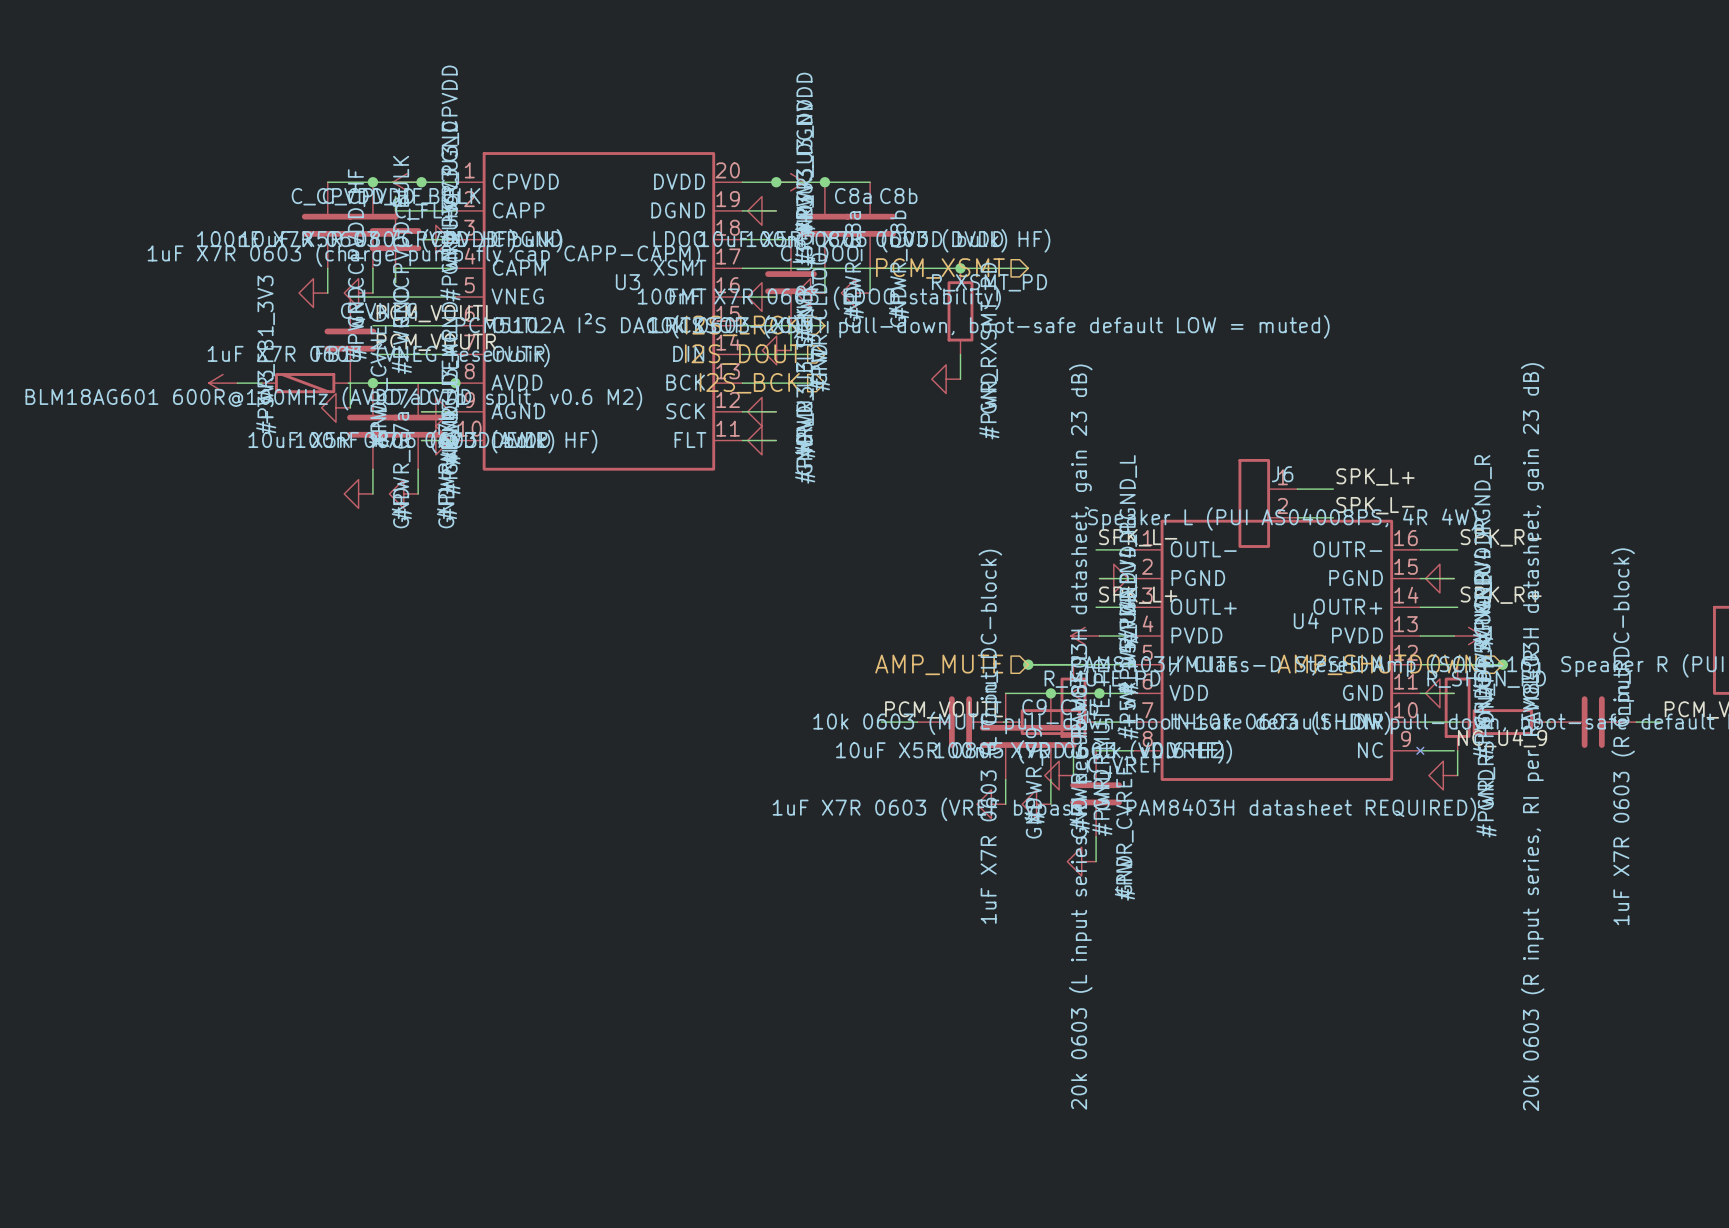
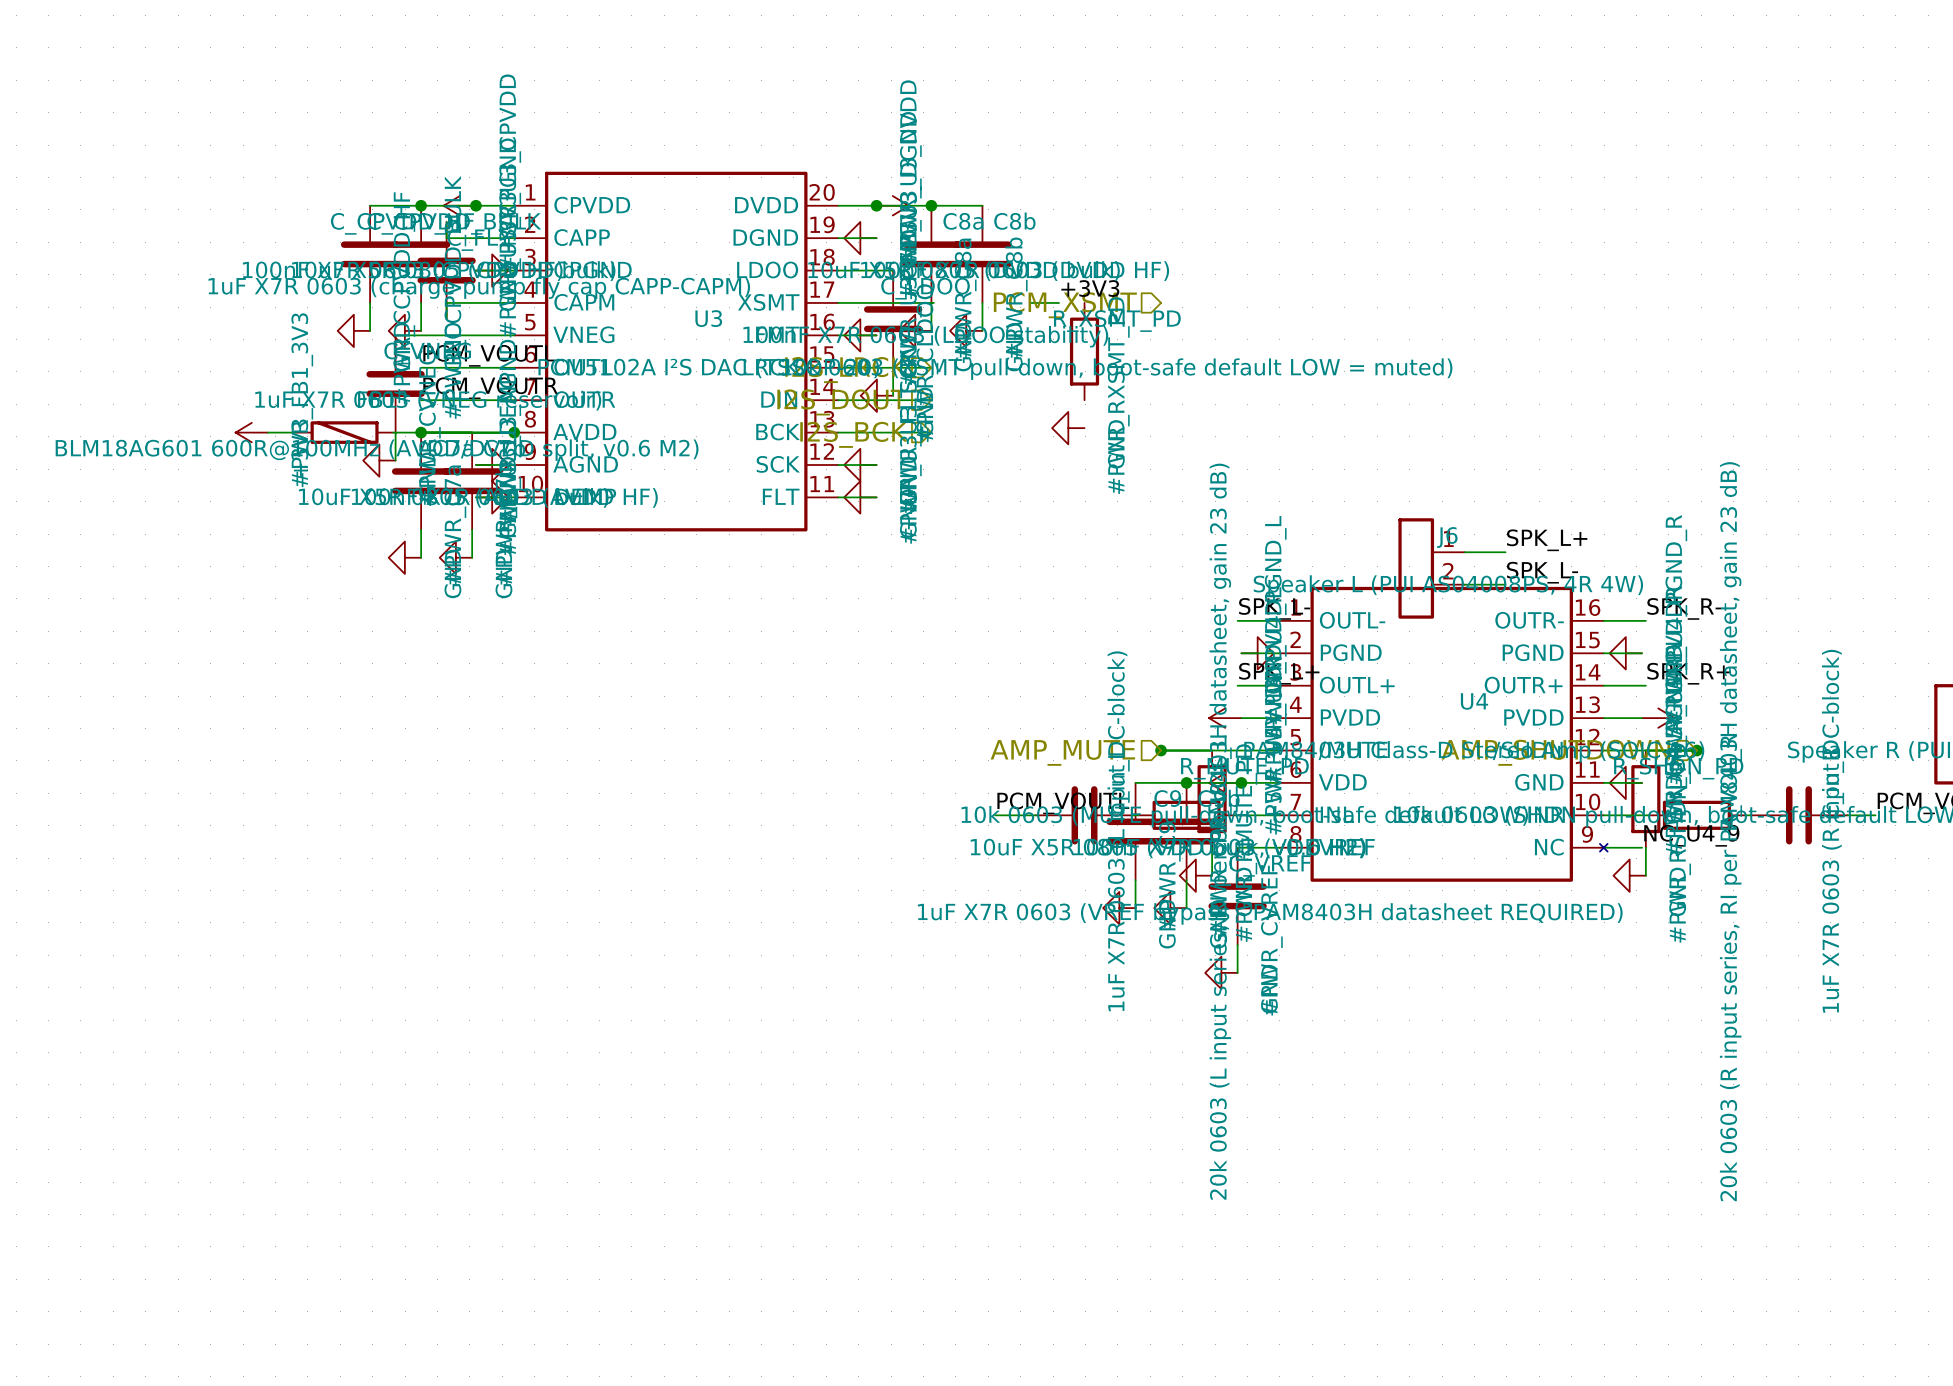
label: none -> +3V3 (1090, 288)
wire: (827, 268) (913, 268) -> none
wire: (937, 268) (1028, 268) -> none
junction: (960, 268) -> none
wire: (960, 354) (960, 379) -> none

